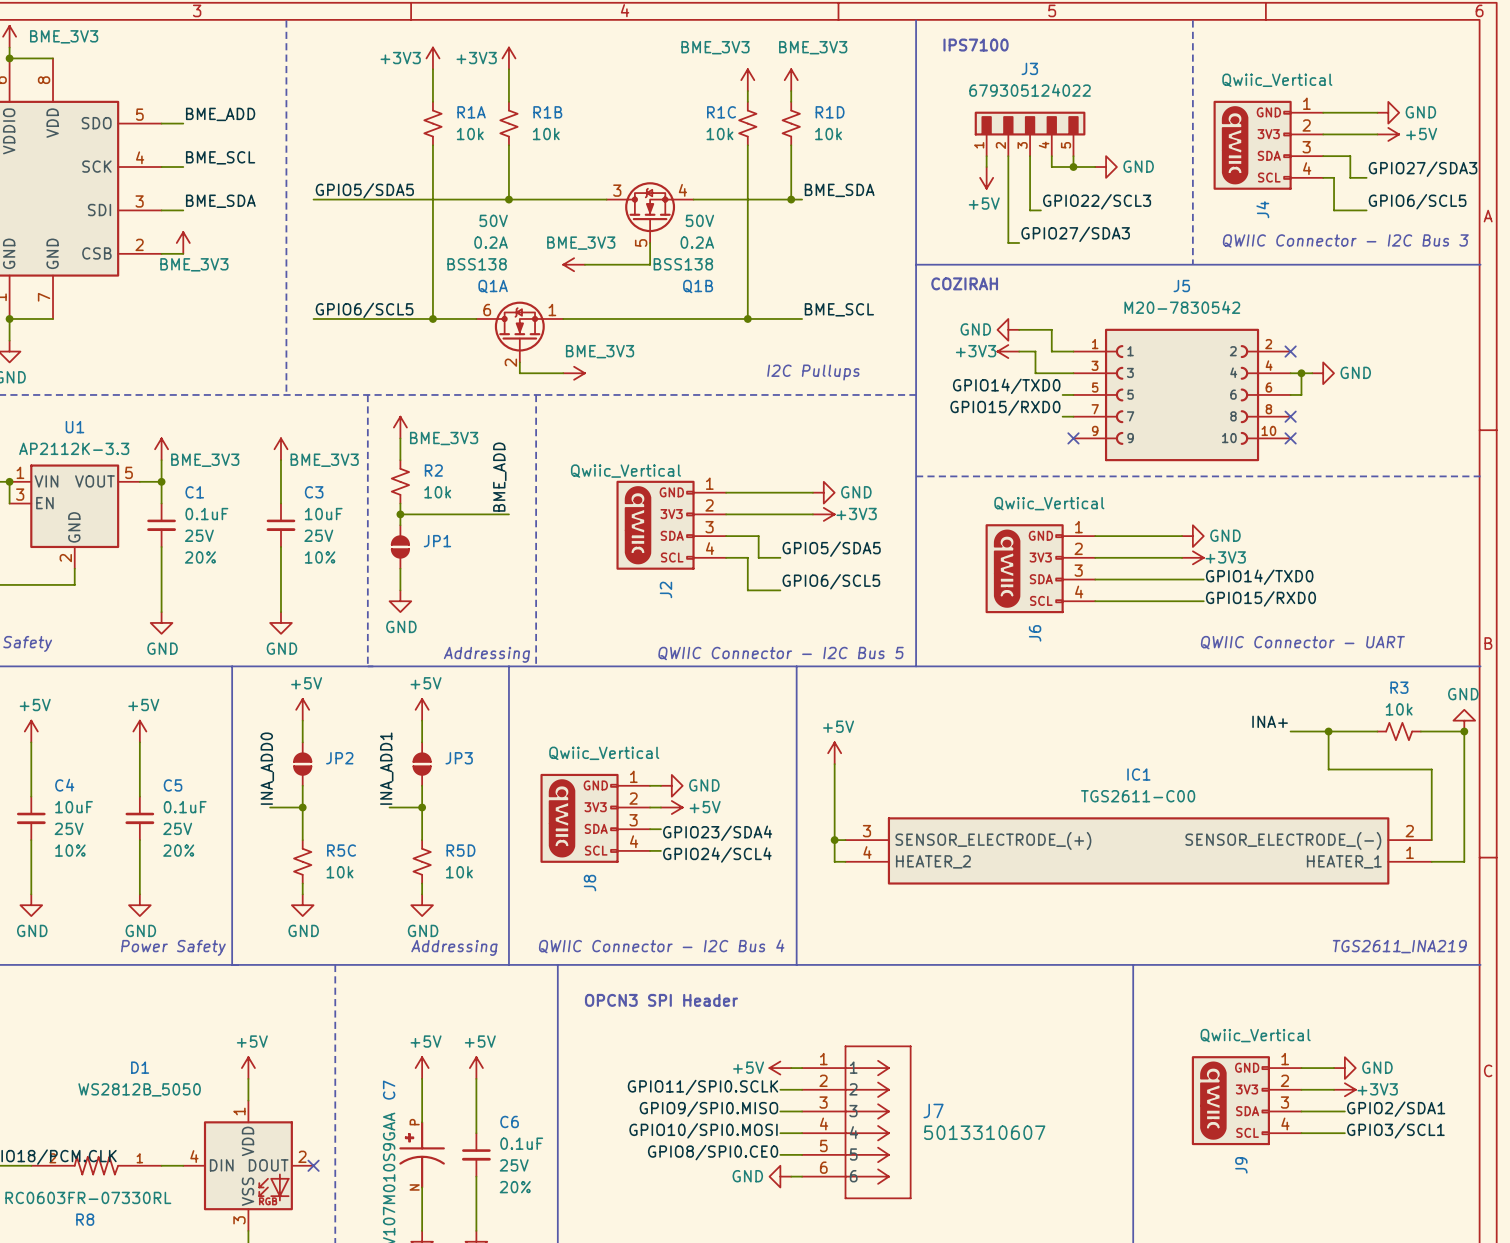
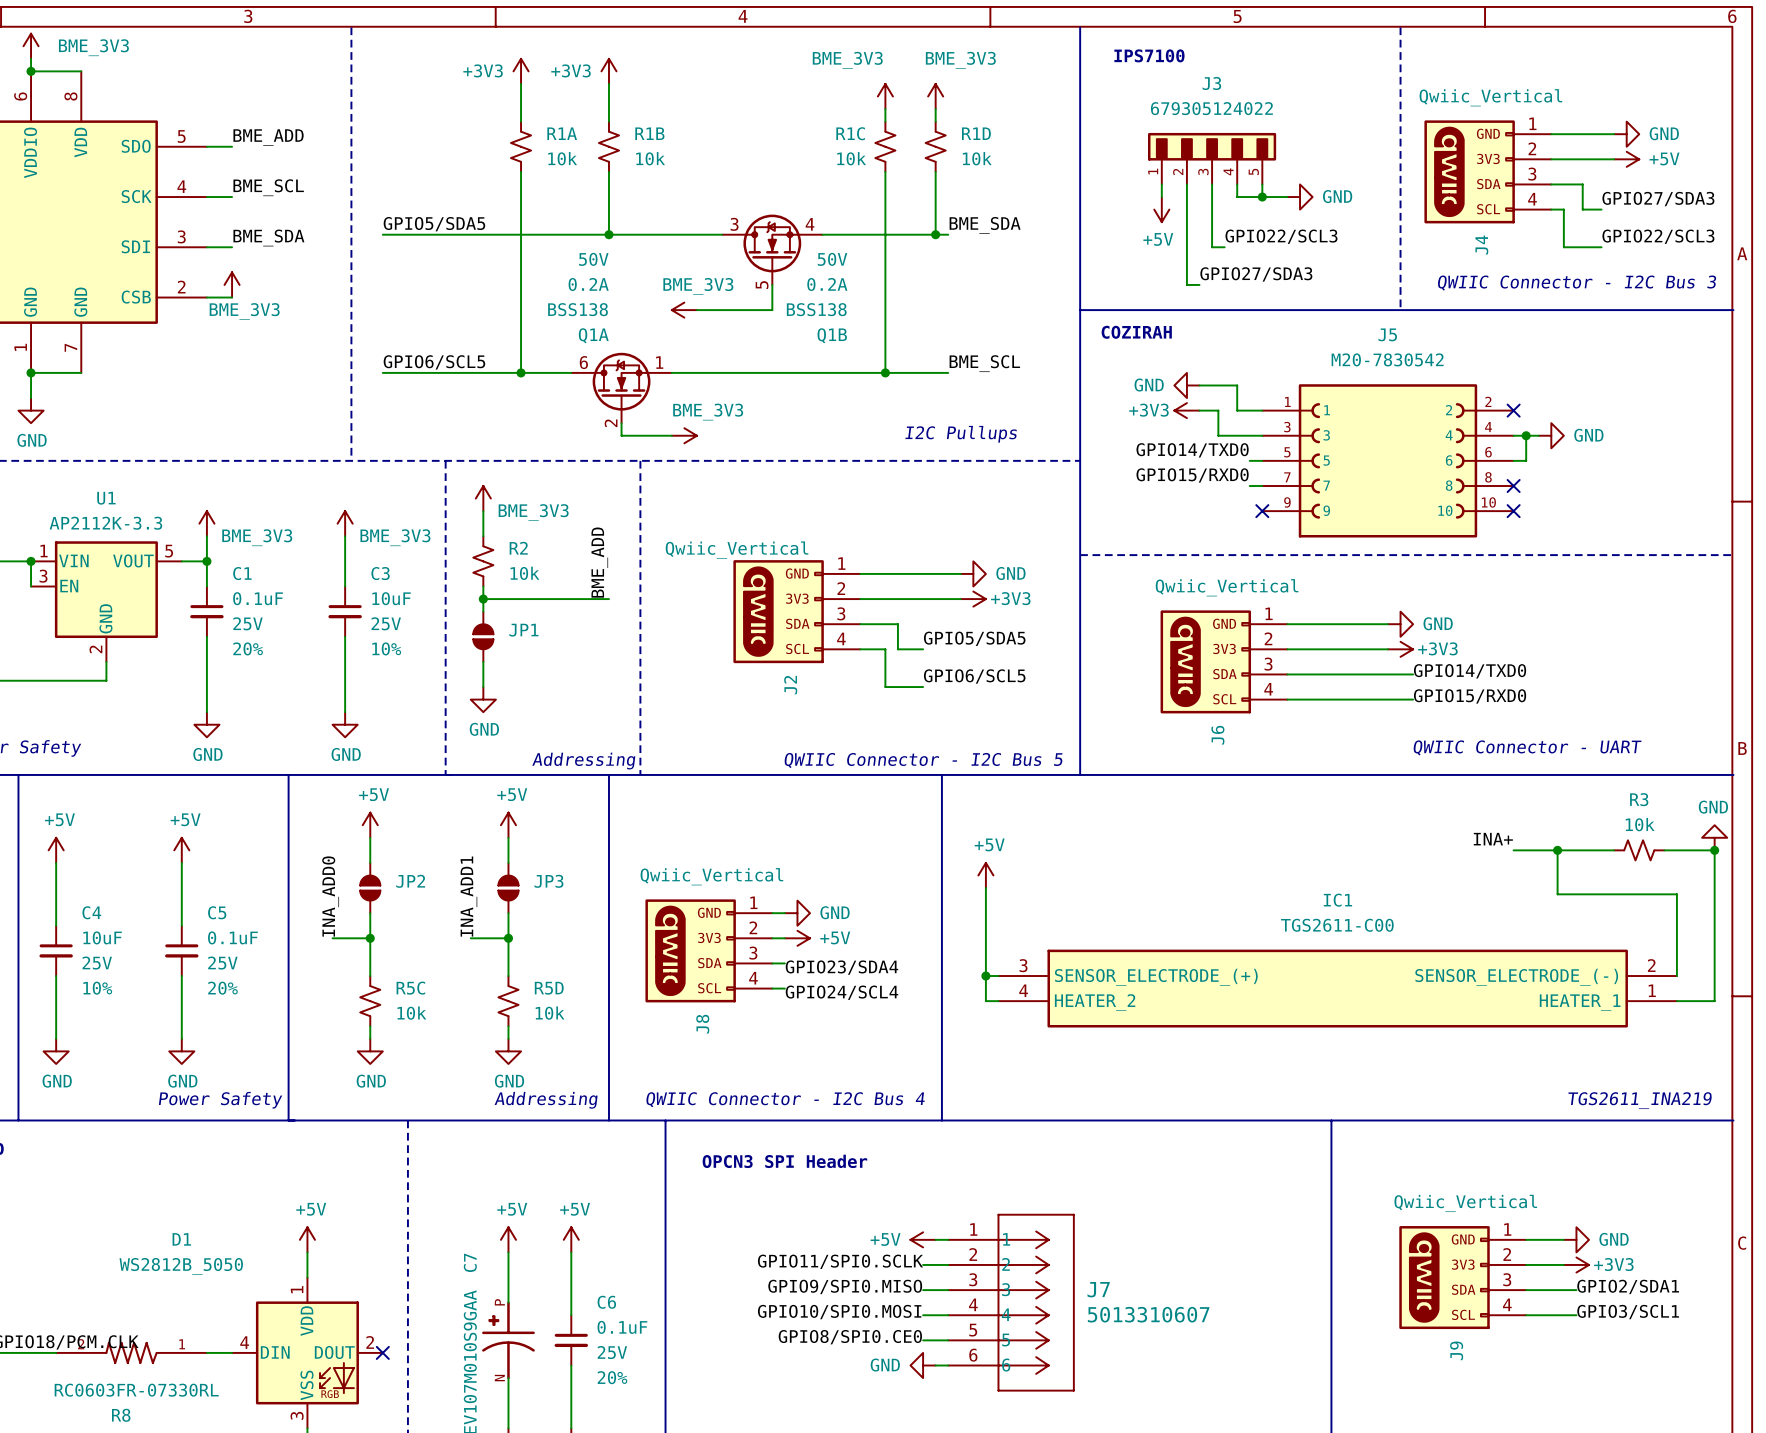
label: GPIO6/SCL5 (1417, 201) -> GPIO22/SCL3 (1658, 236)

